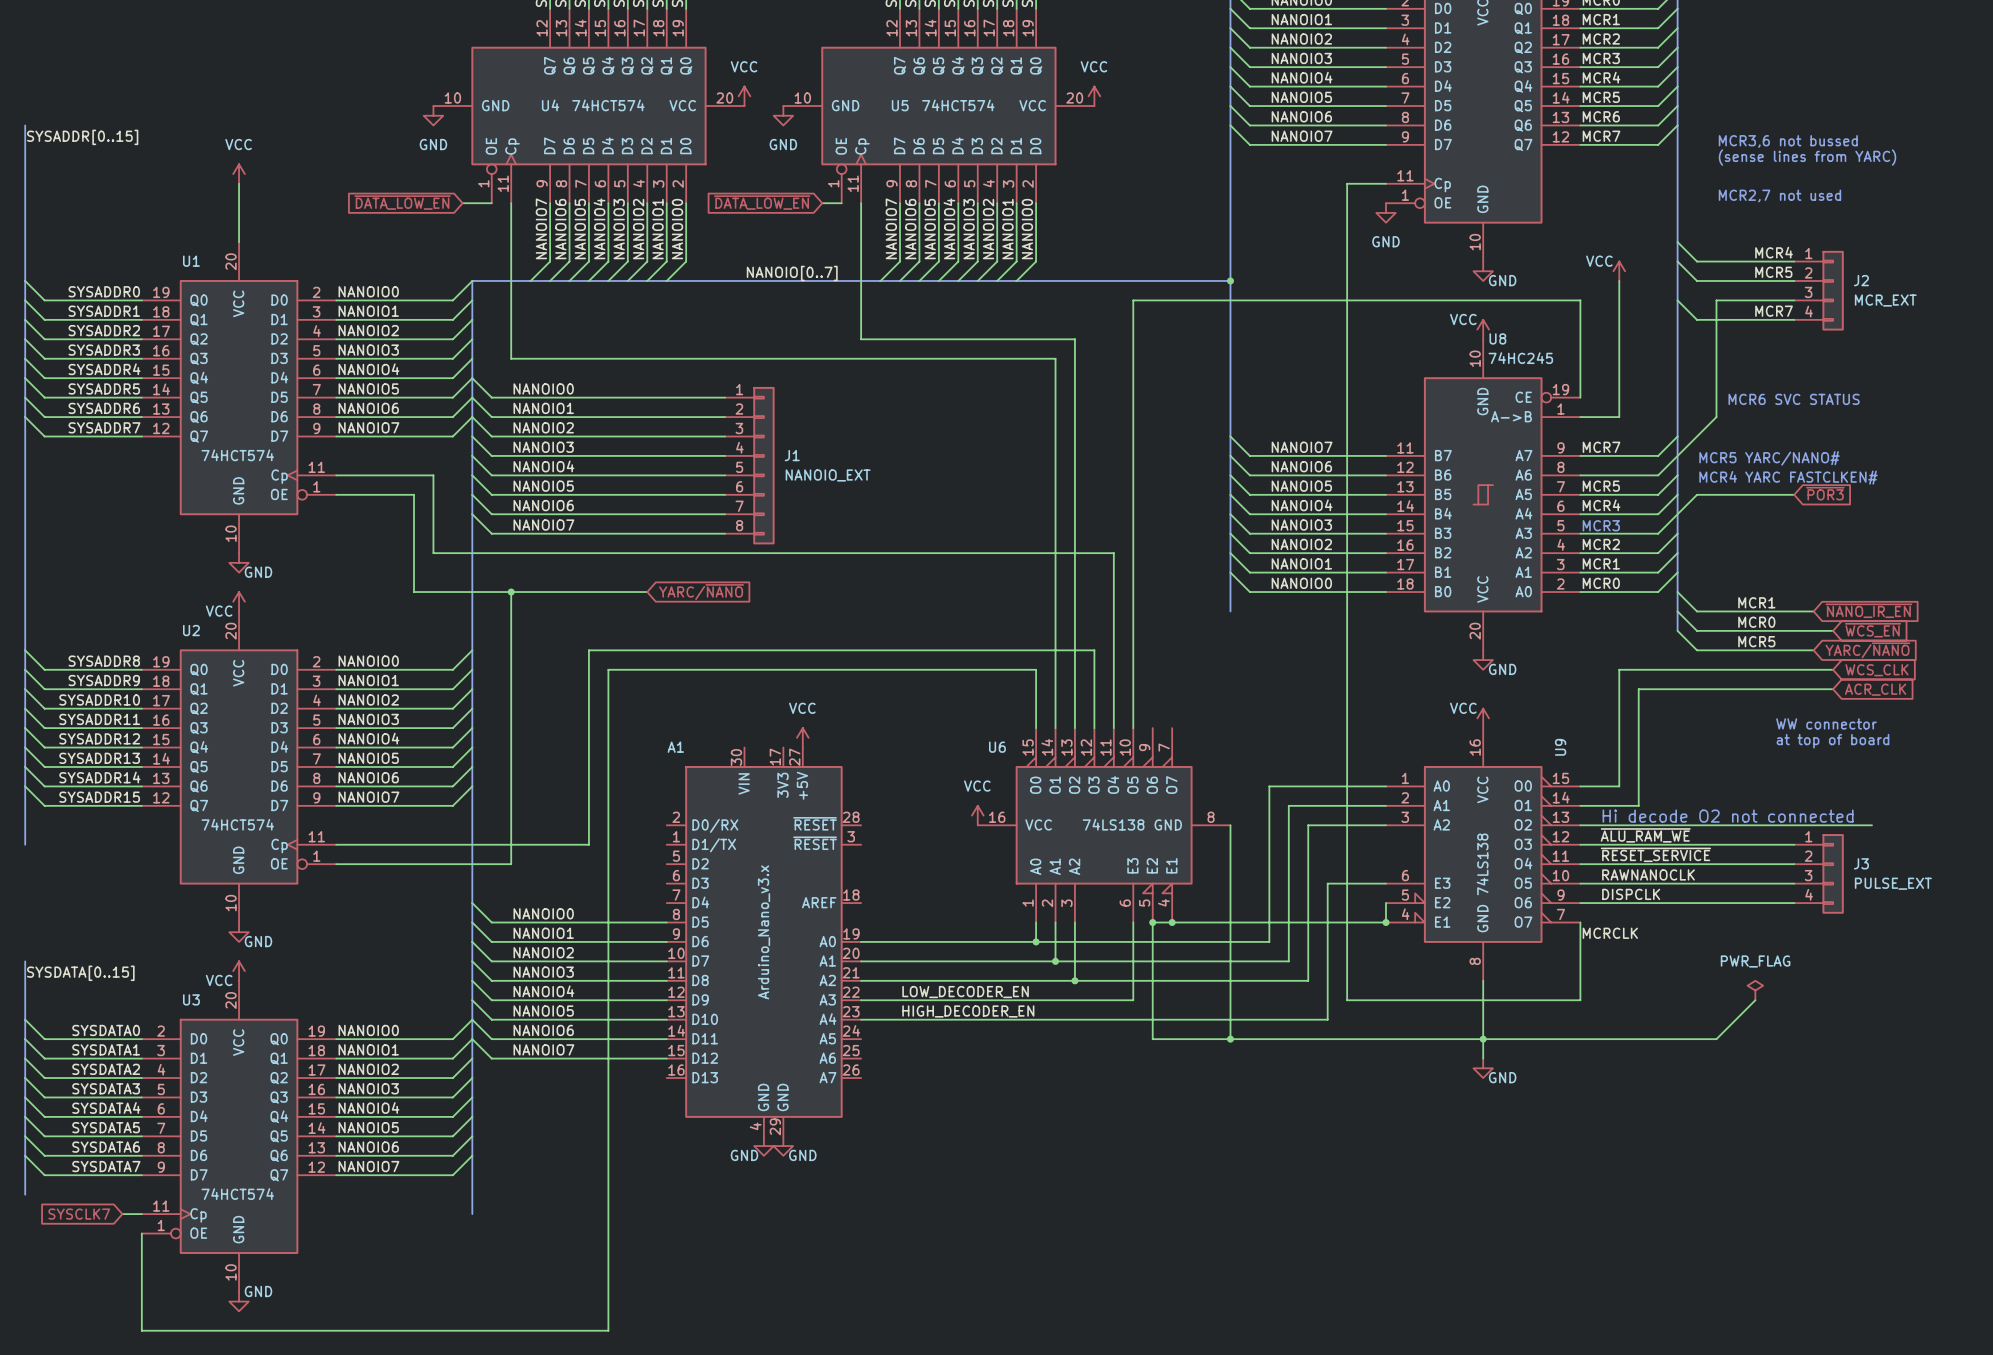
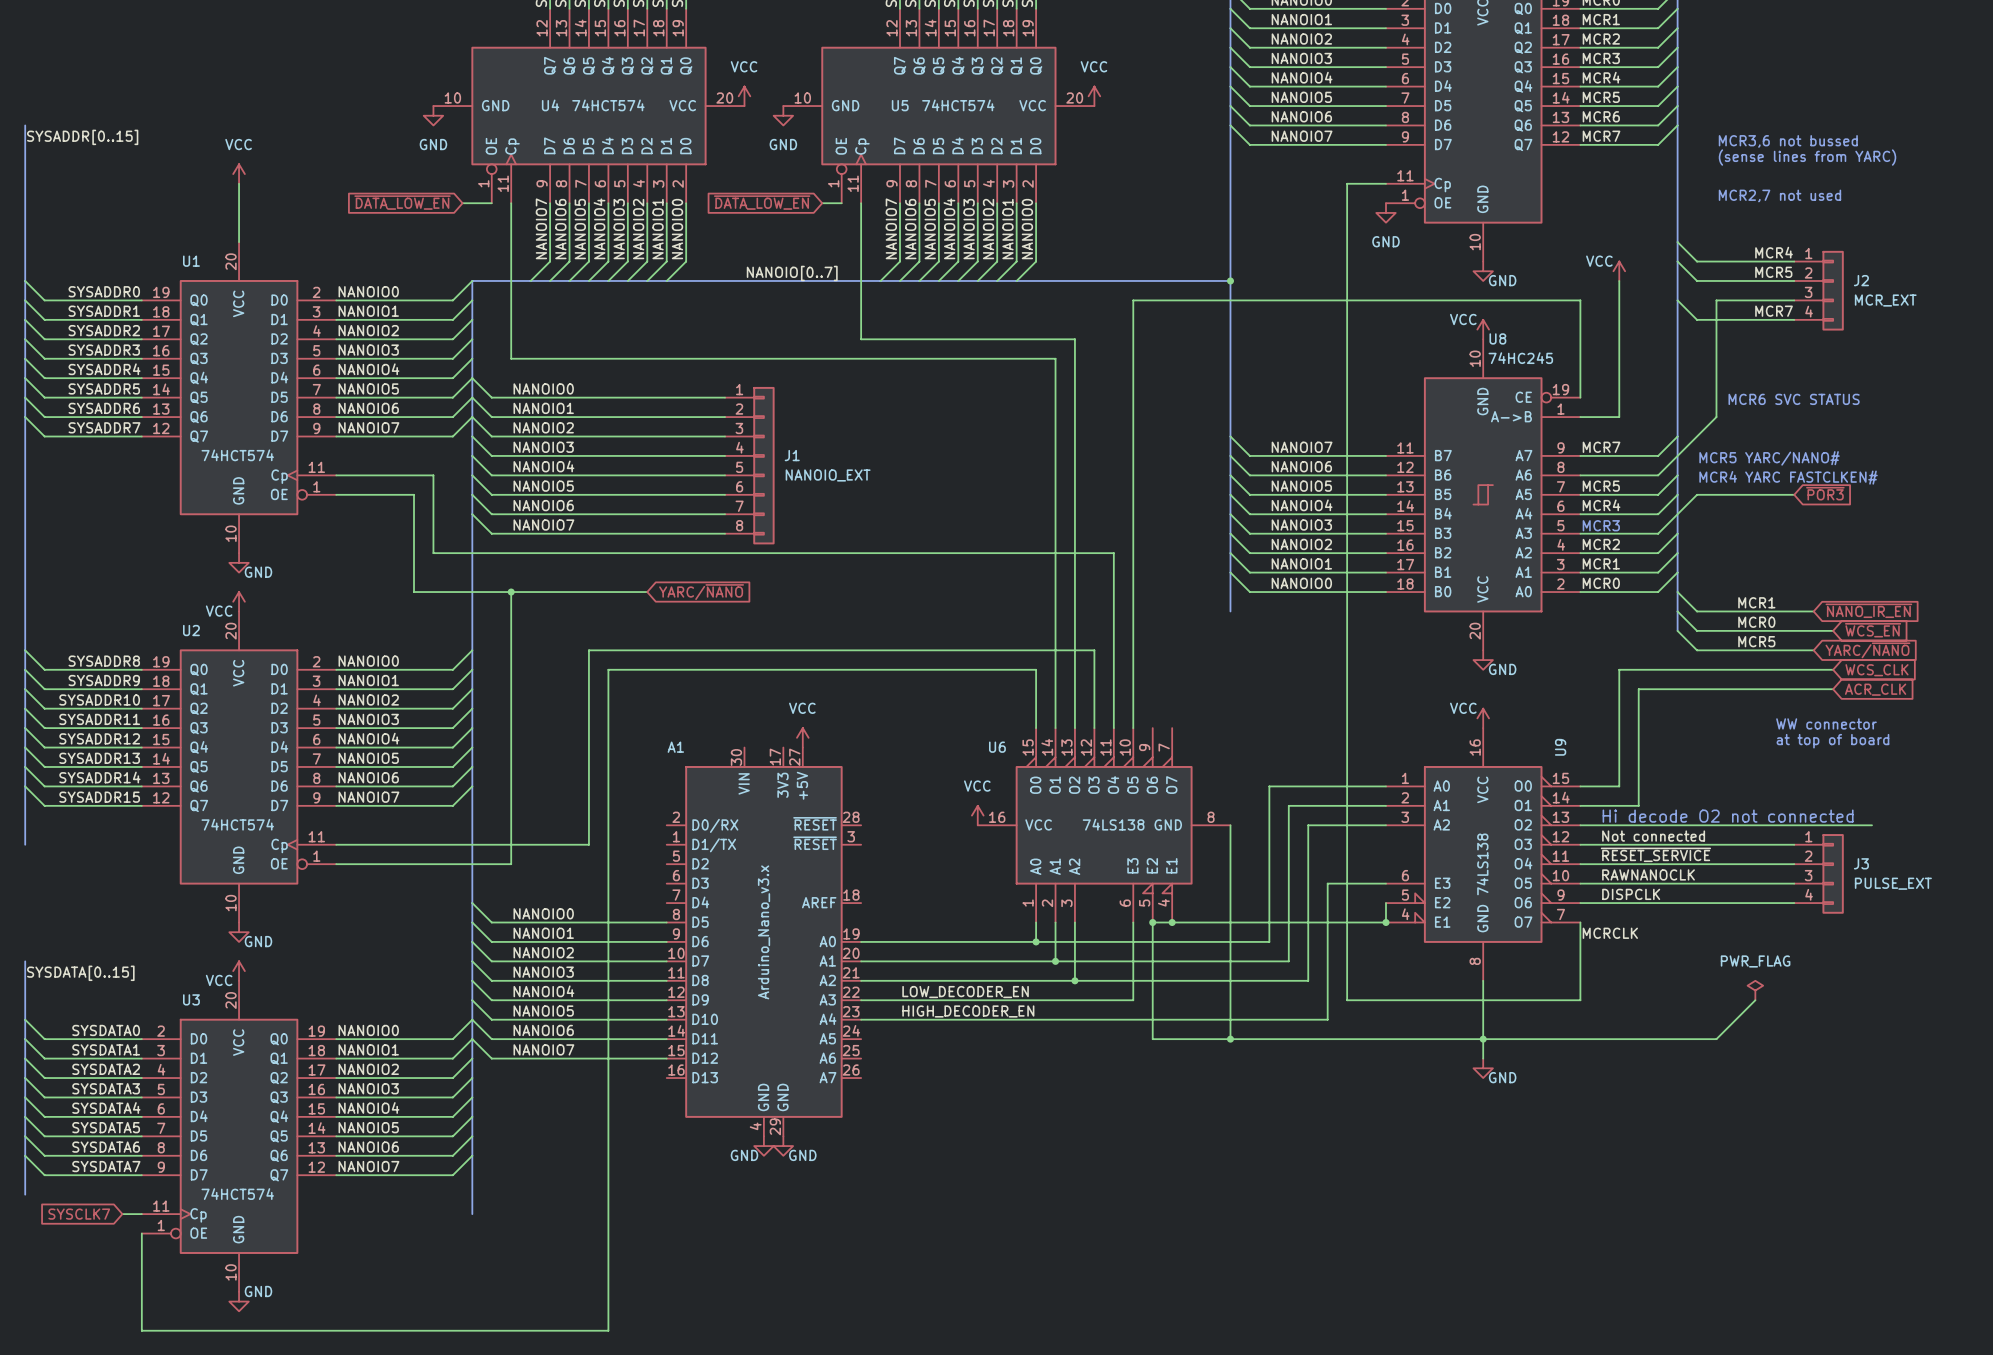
label: ~{ALU_RAM_WE} (1645, 835) -> Not connected (1653, 836)

